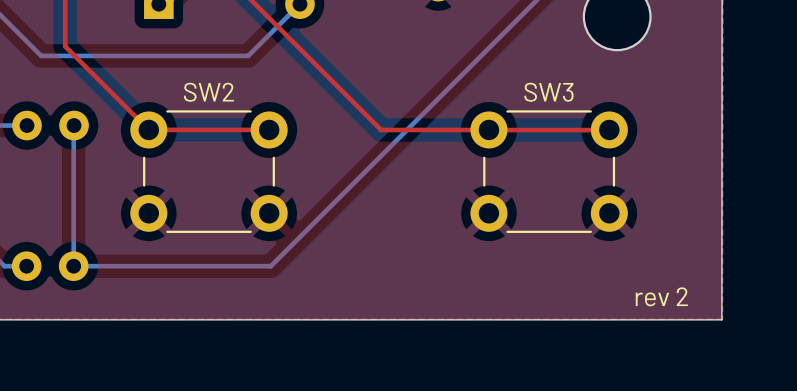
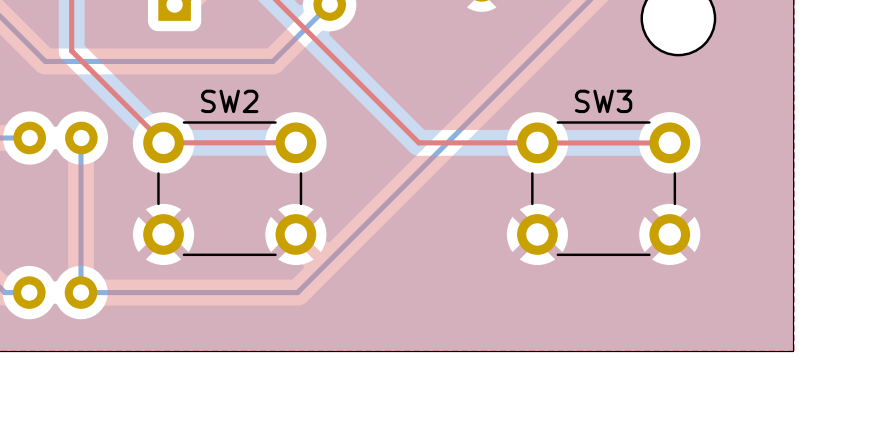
text: rev 2 (661, 296) -> none

